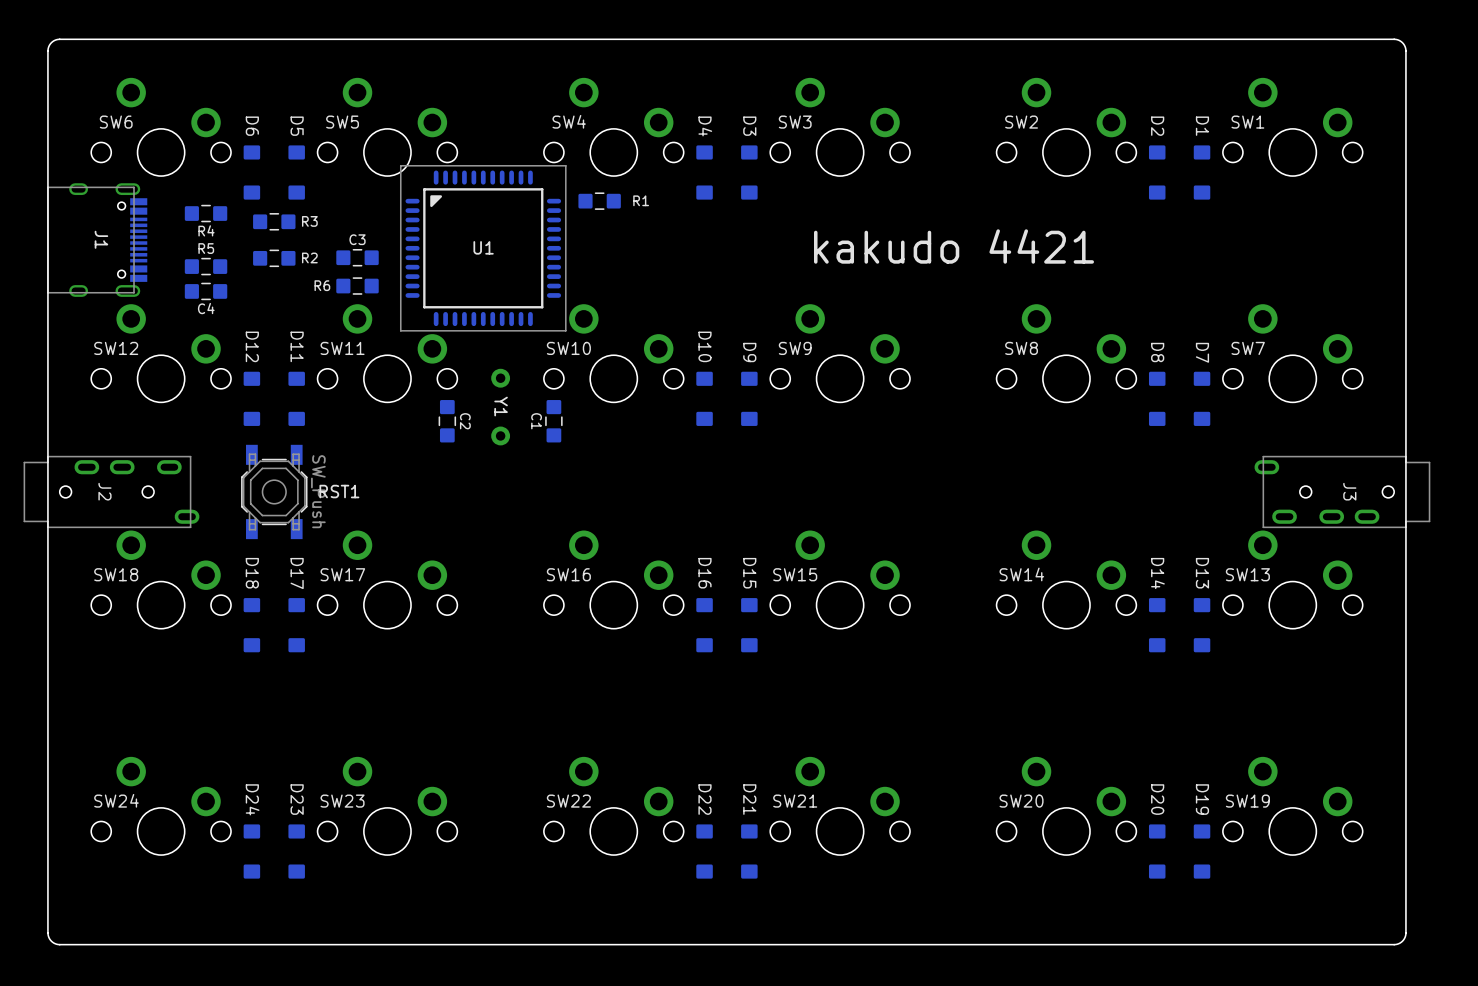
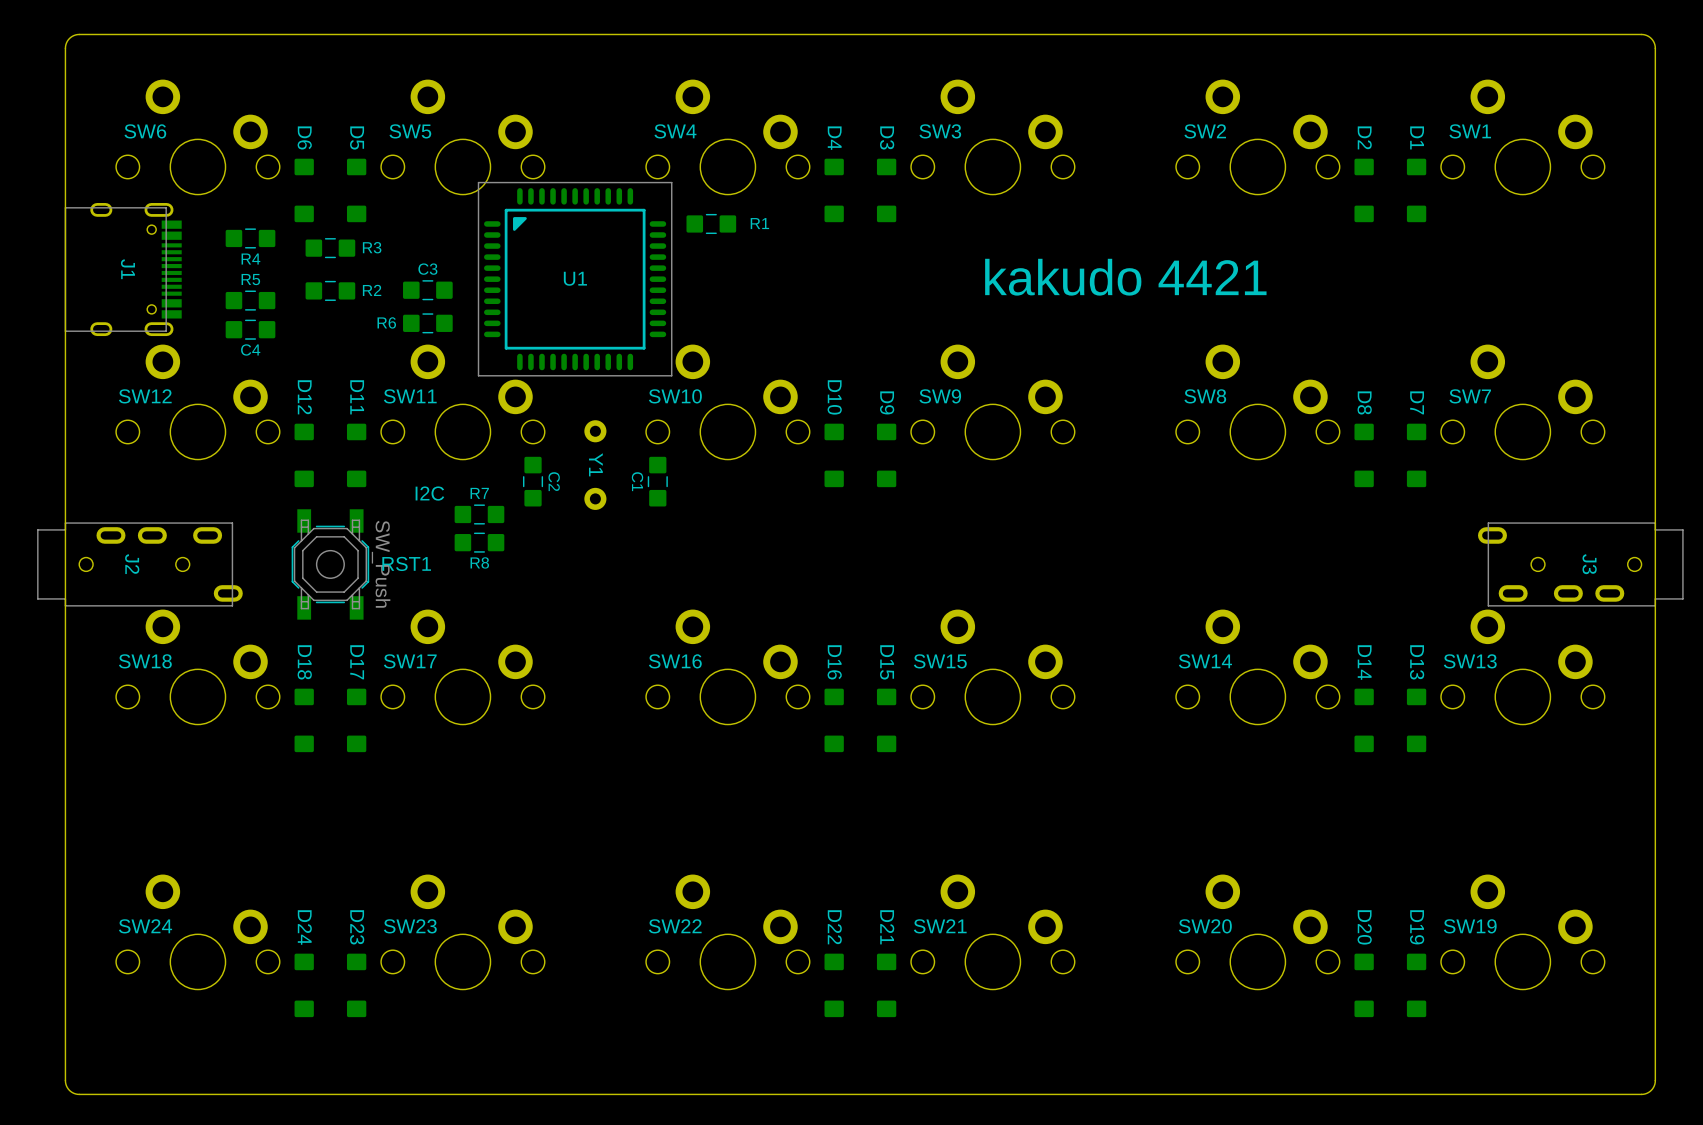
text: none -> I2C (429, 493)
R7: none -> (479, 514)
R8: none -> (479, 542)

